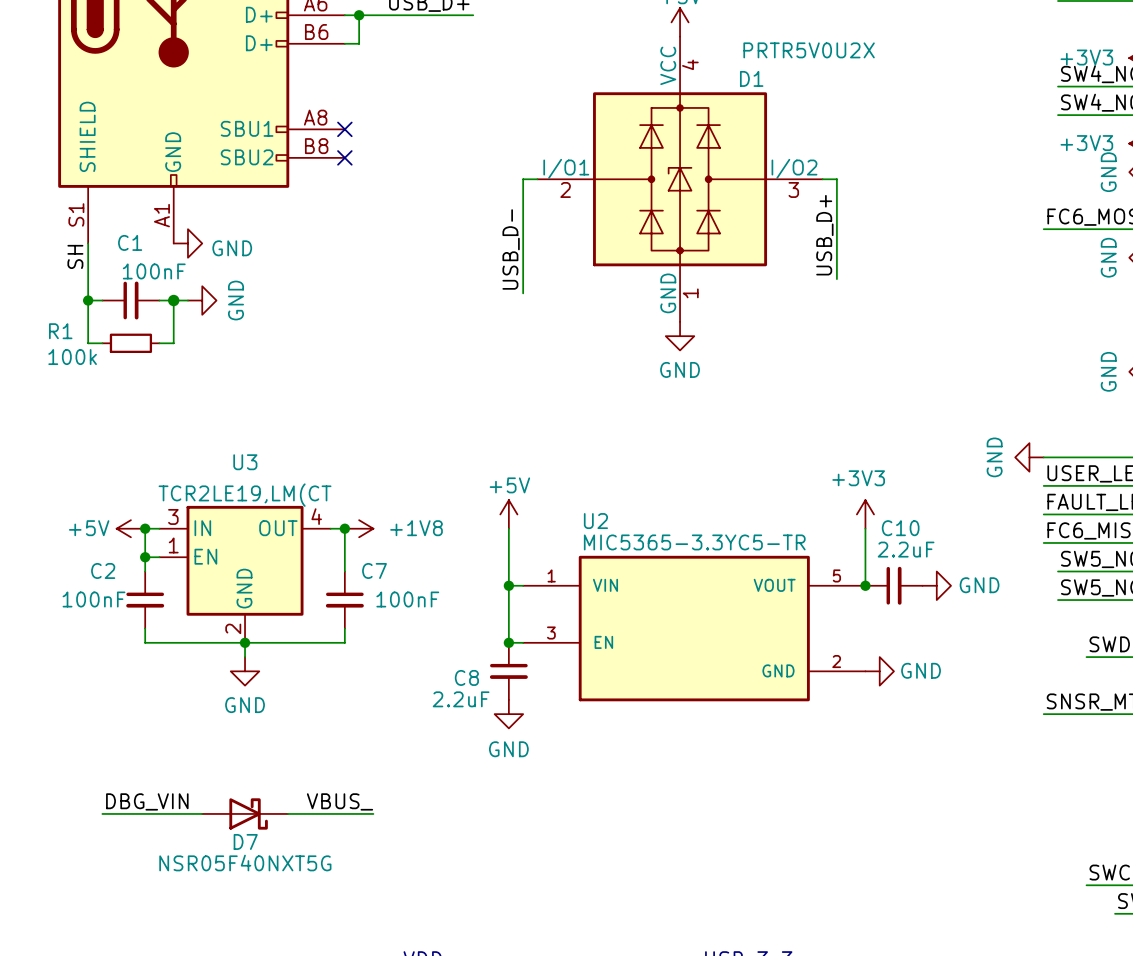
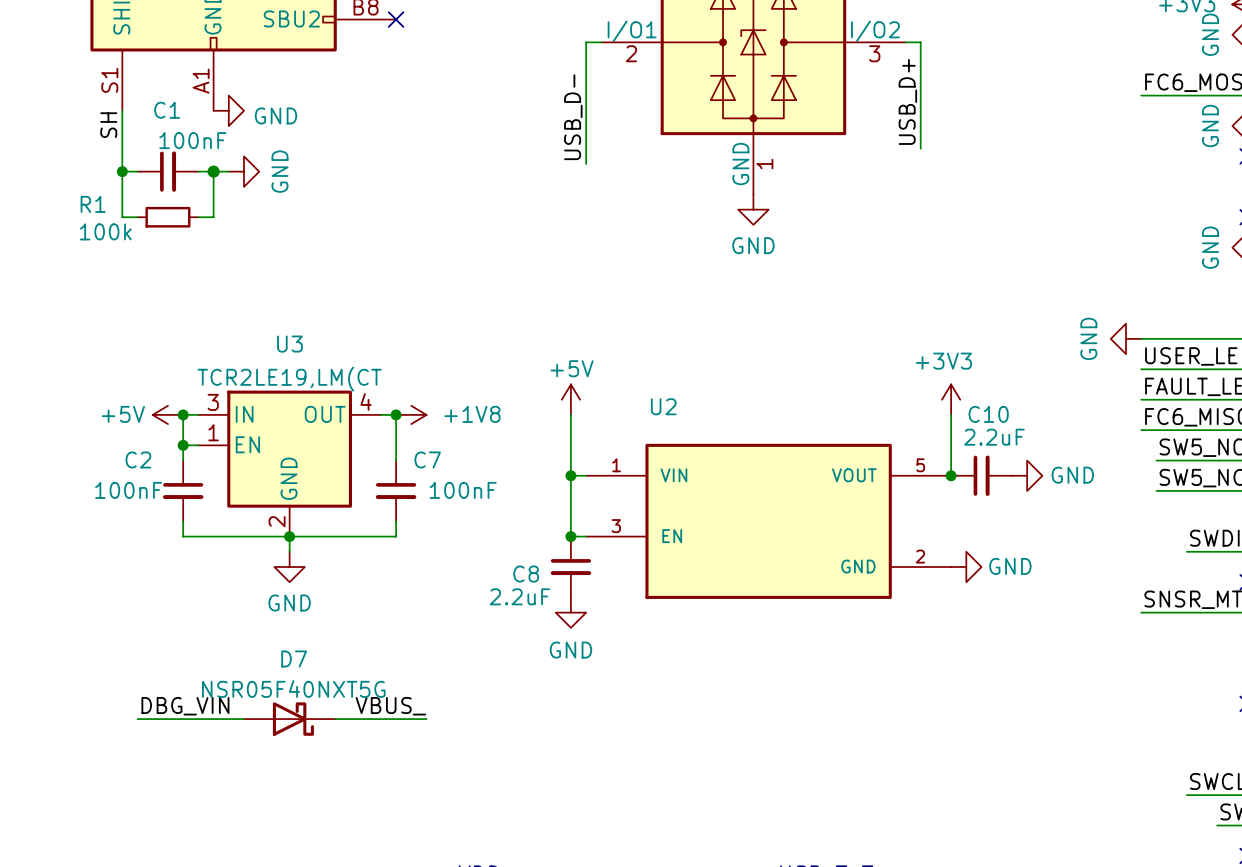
U2 value: MIC5365-3.3YC5-TR (694, 542) -> none
D7 name position: D7 (245, 841) -> D7 (294, 658)
D7 value position: NSR05F40NXT5G (245, 863) -> NSR05F40NXT5G (293, 689)

